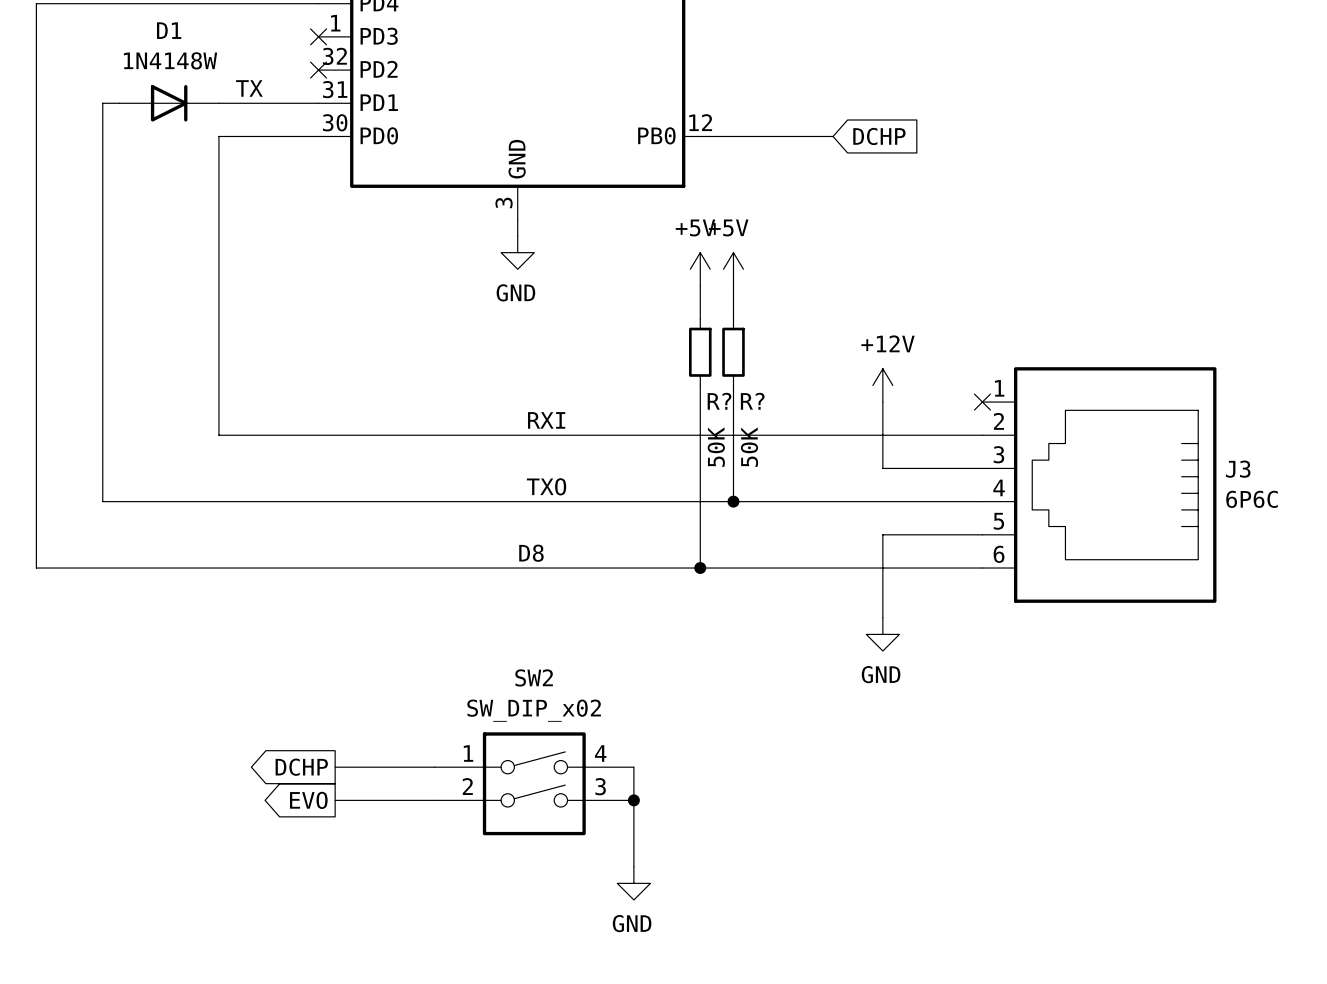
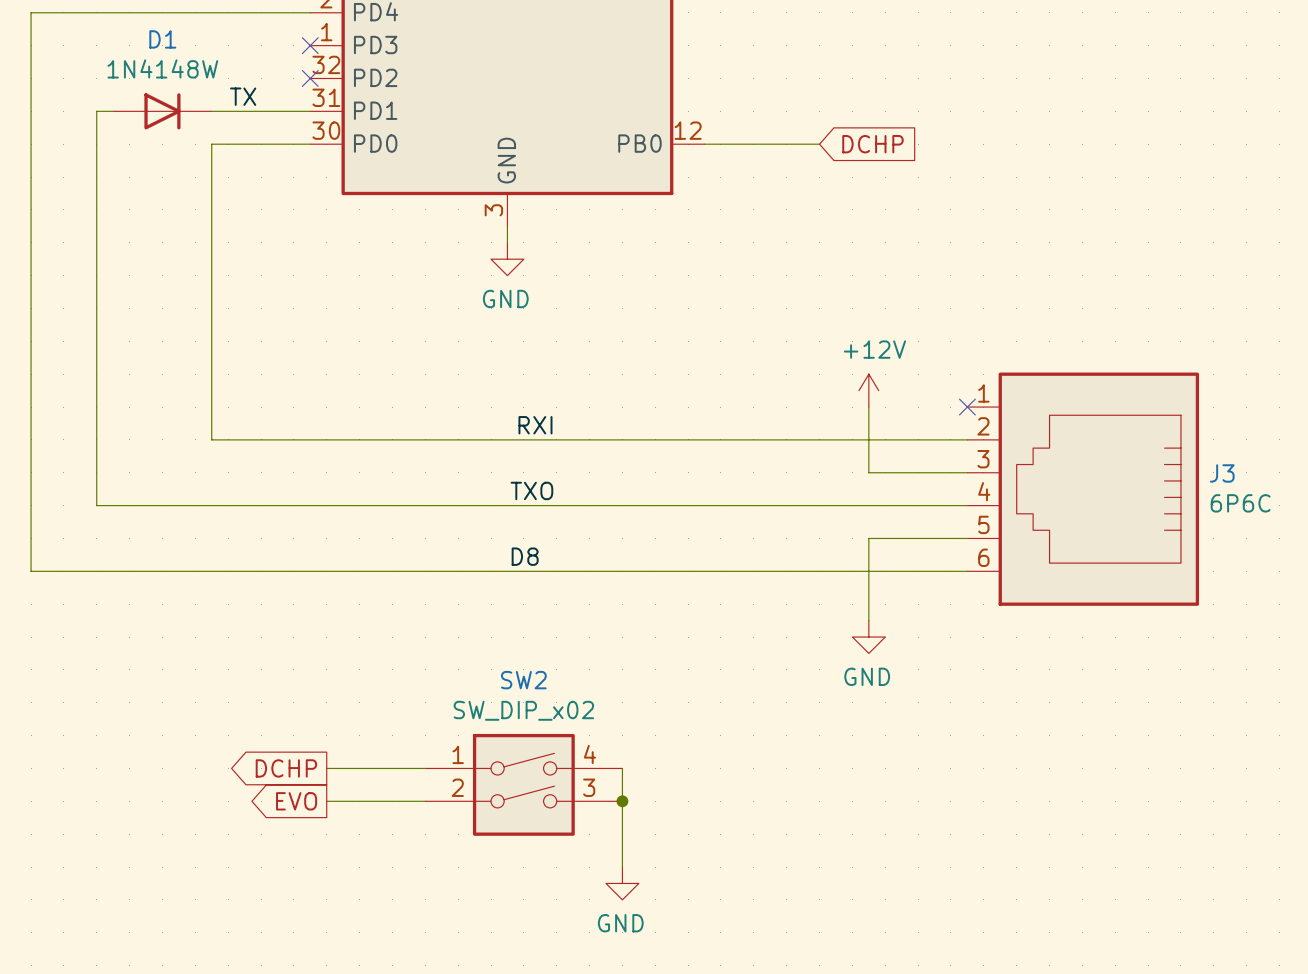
power symbol: +5V (700, 269) -> none
power symbol: +5V (733, 269) -> none
wire: (700, 285) (700, 319) -> none
wire: (733, 285) (733, 319) -> none
R?: 50K (700, 352) -> none
R?: 50K (733, 352) -> none
wire: (700, 385) (700, 568) -> none
wire: (733, 385) (733, 501) -> none
junction: (733, 501) -> none
junction: (700, 568) -> none

